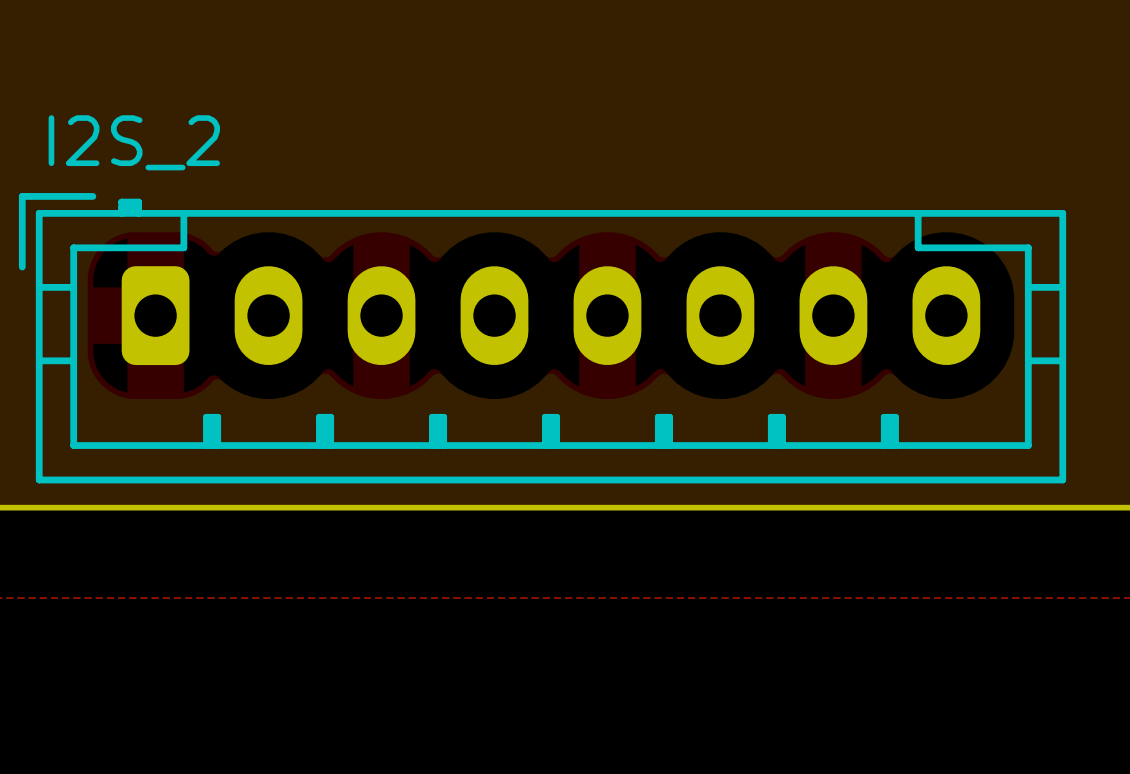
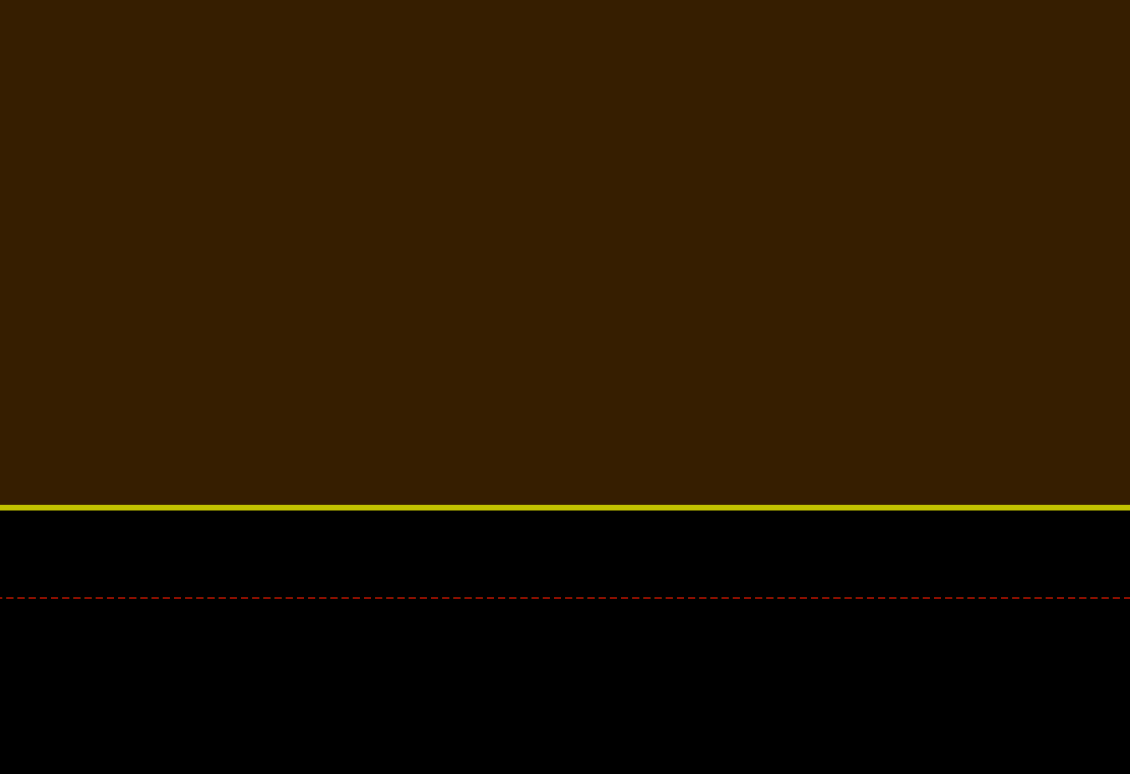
text: I2S_2 (134, 142) -> none
part: (542, 338) -> none

